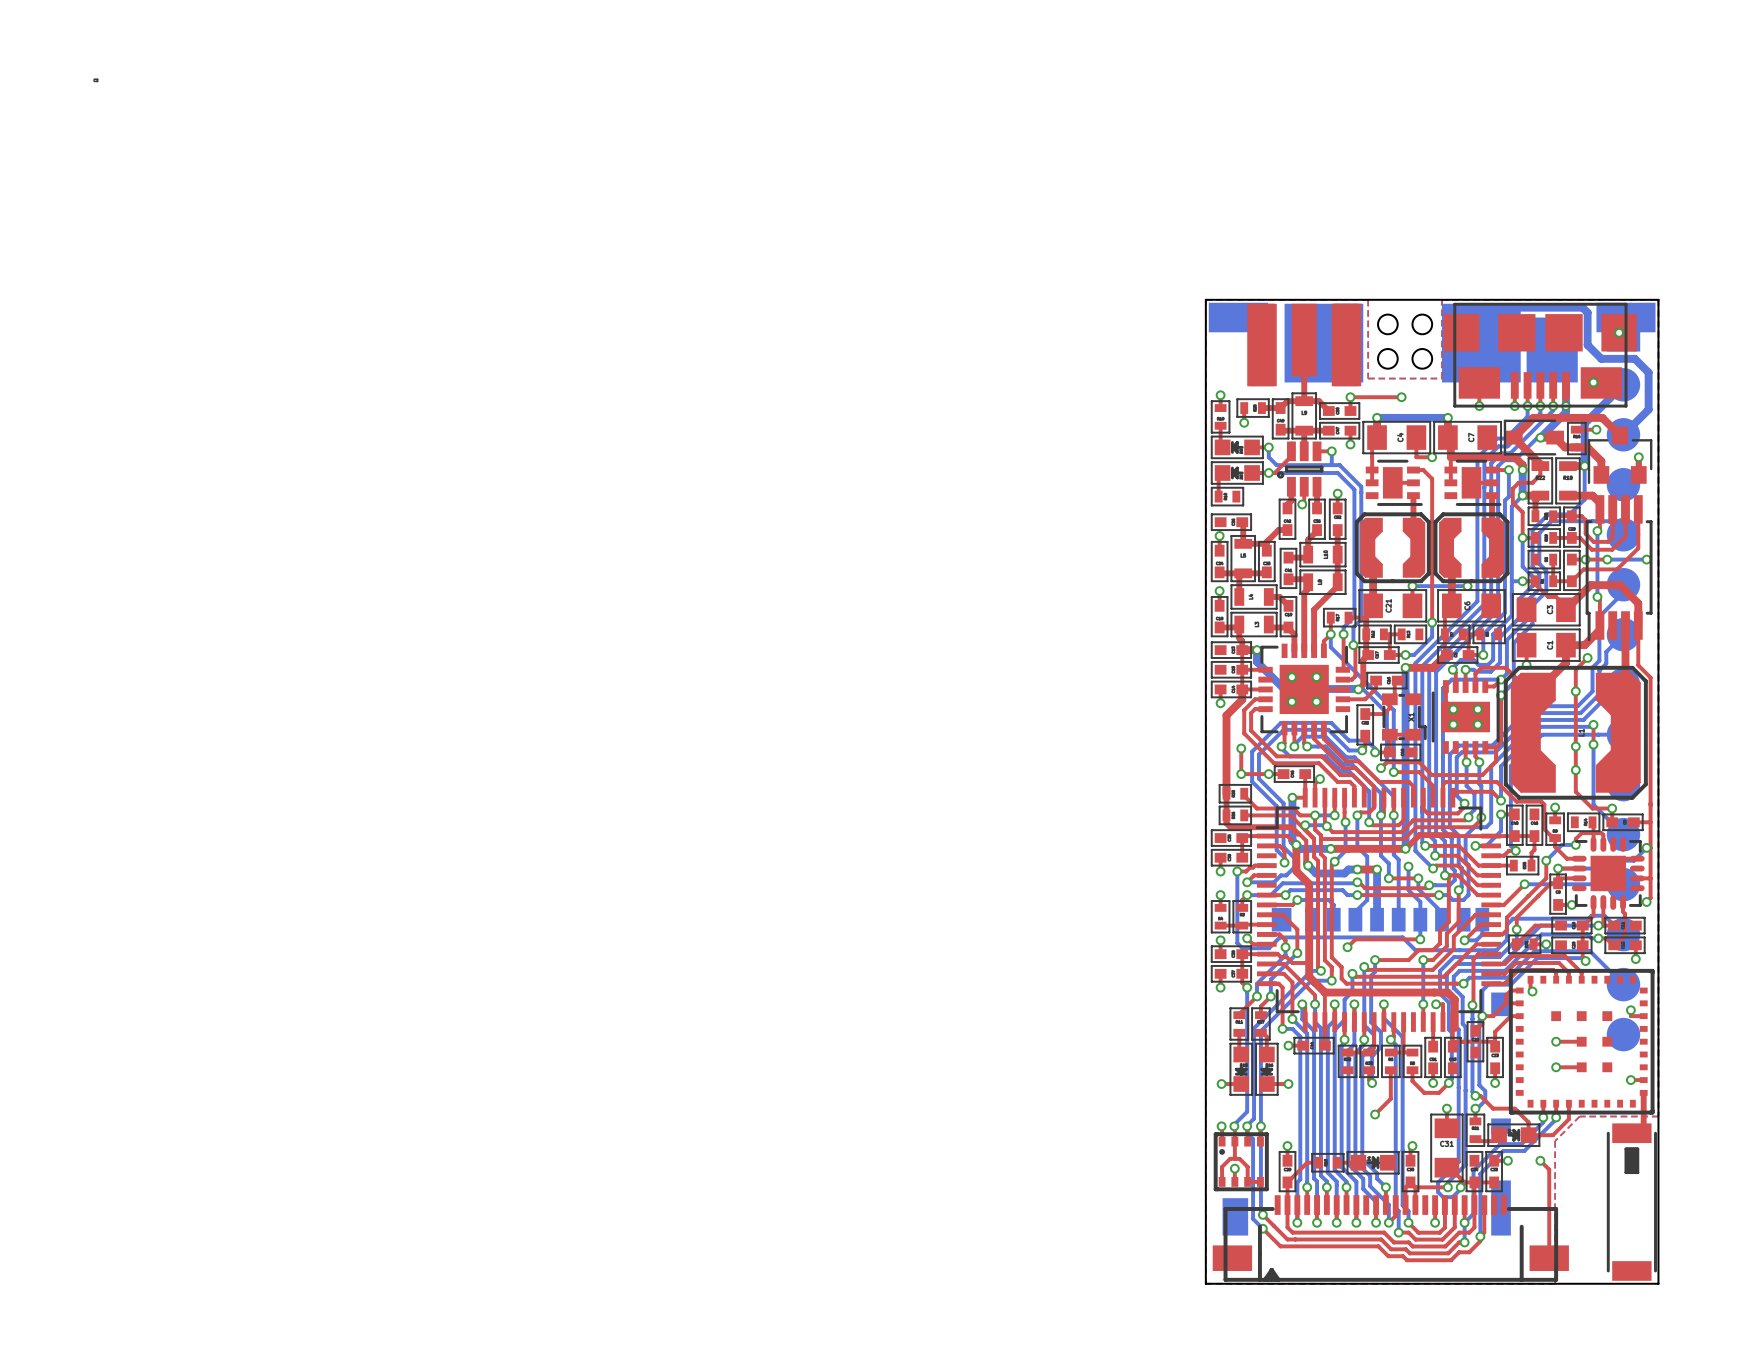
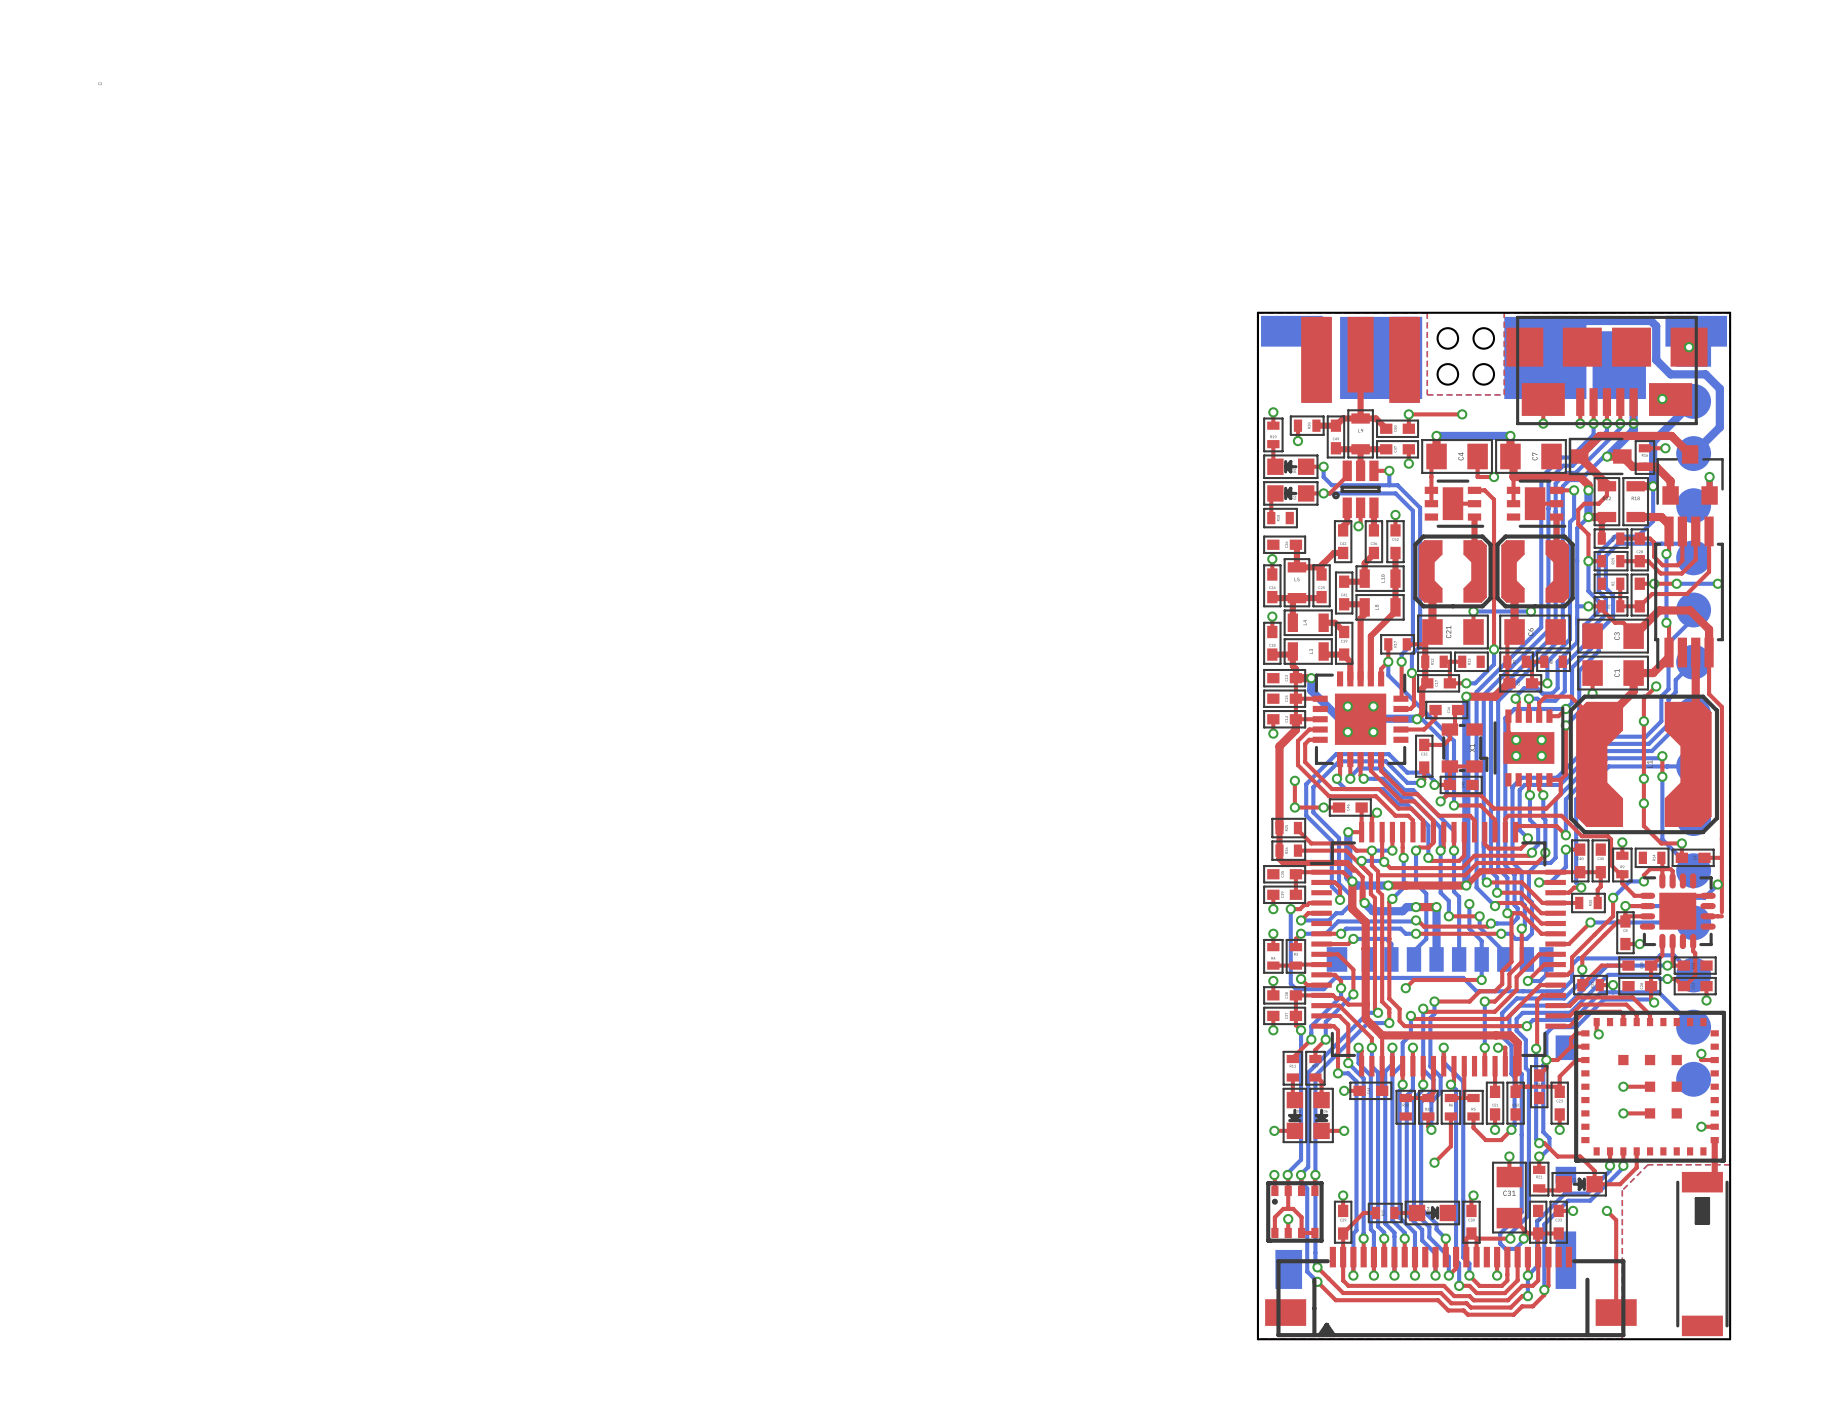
top track: (1650, 874) (1650, 898) (1646, 901) -> none
via: (1646, 901) -> none

